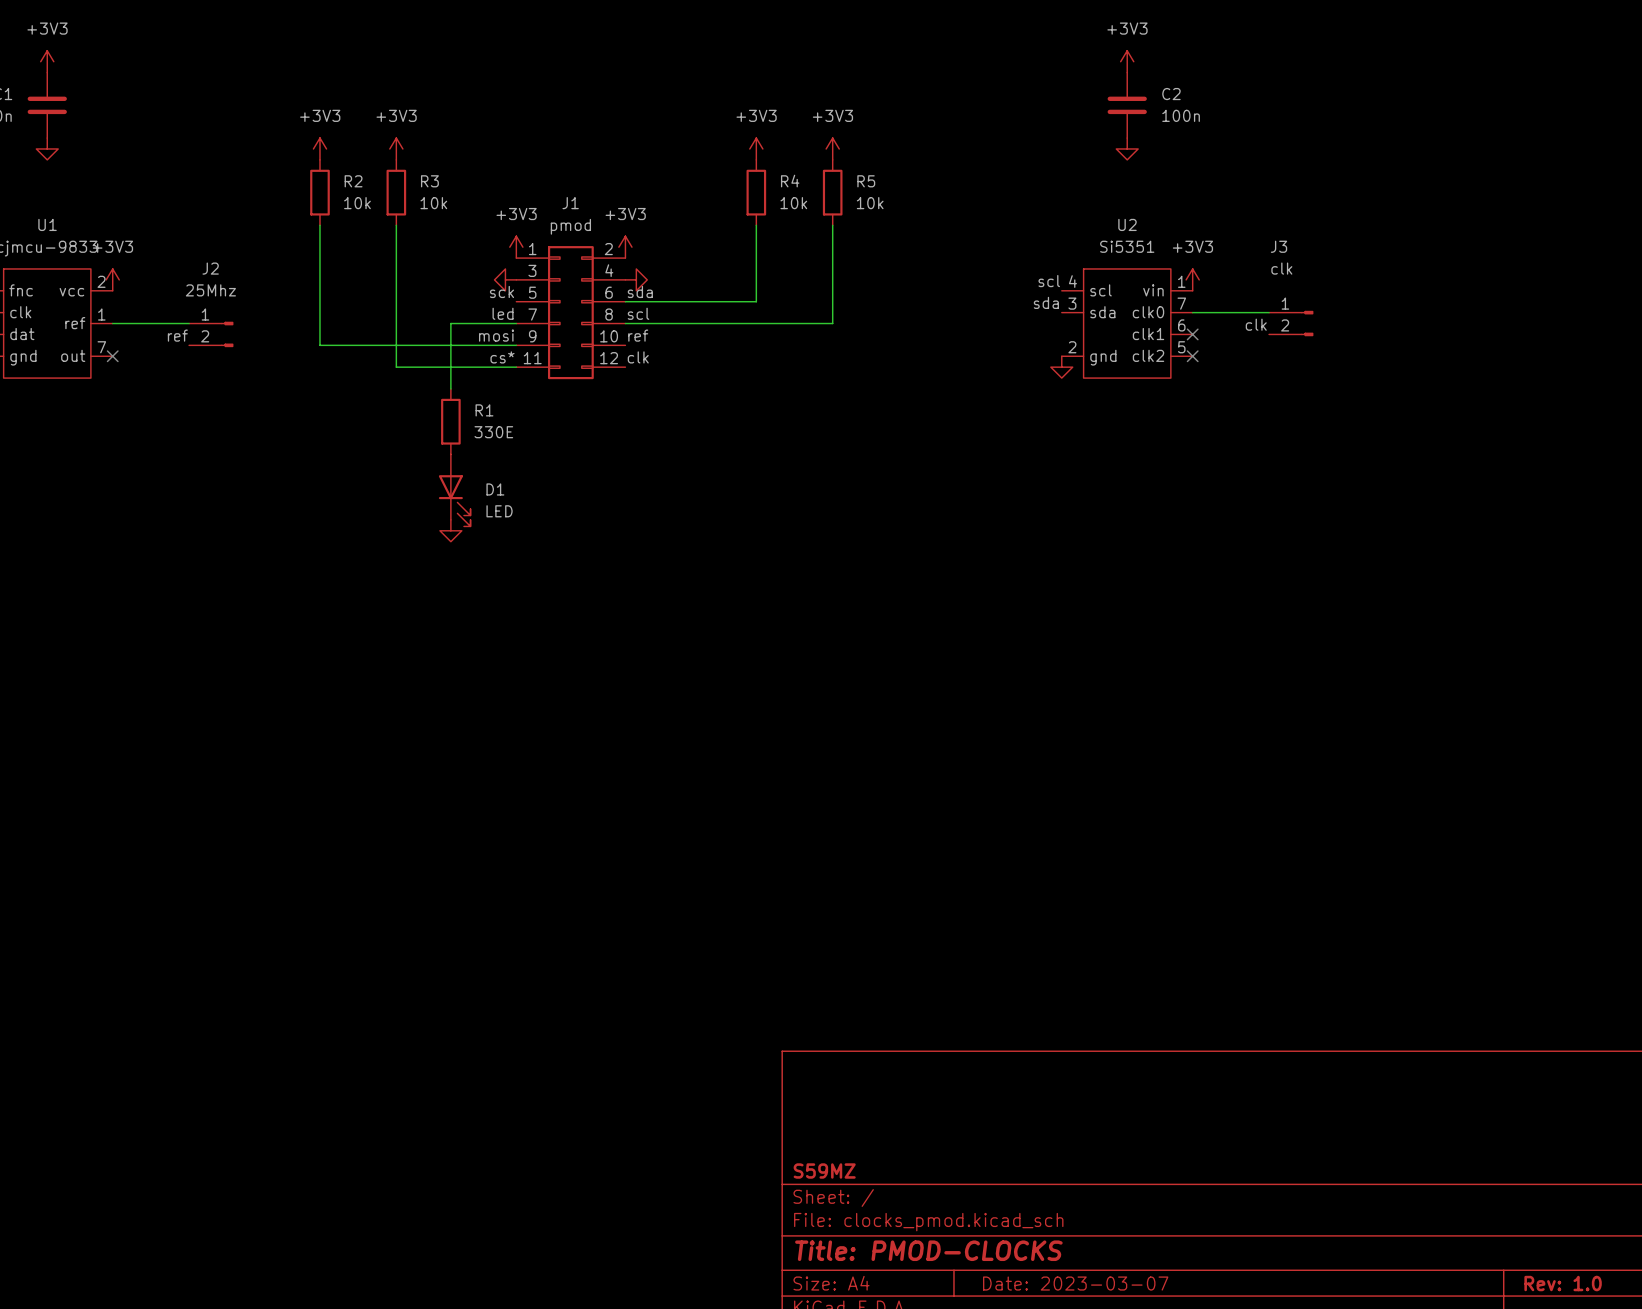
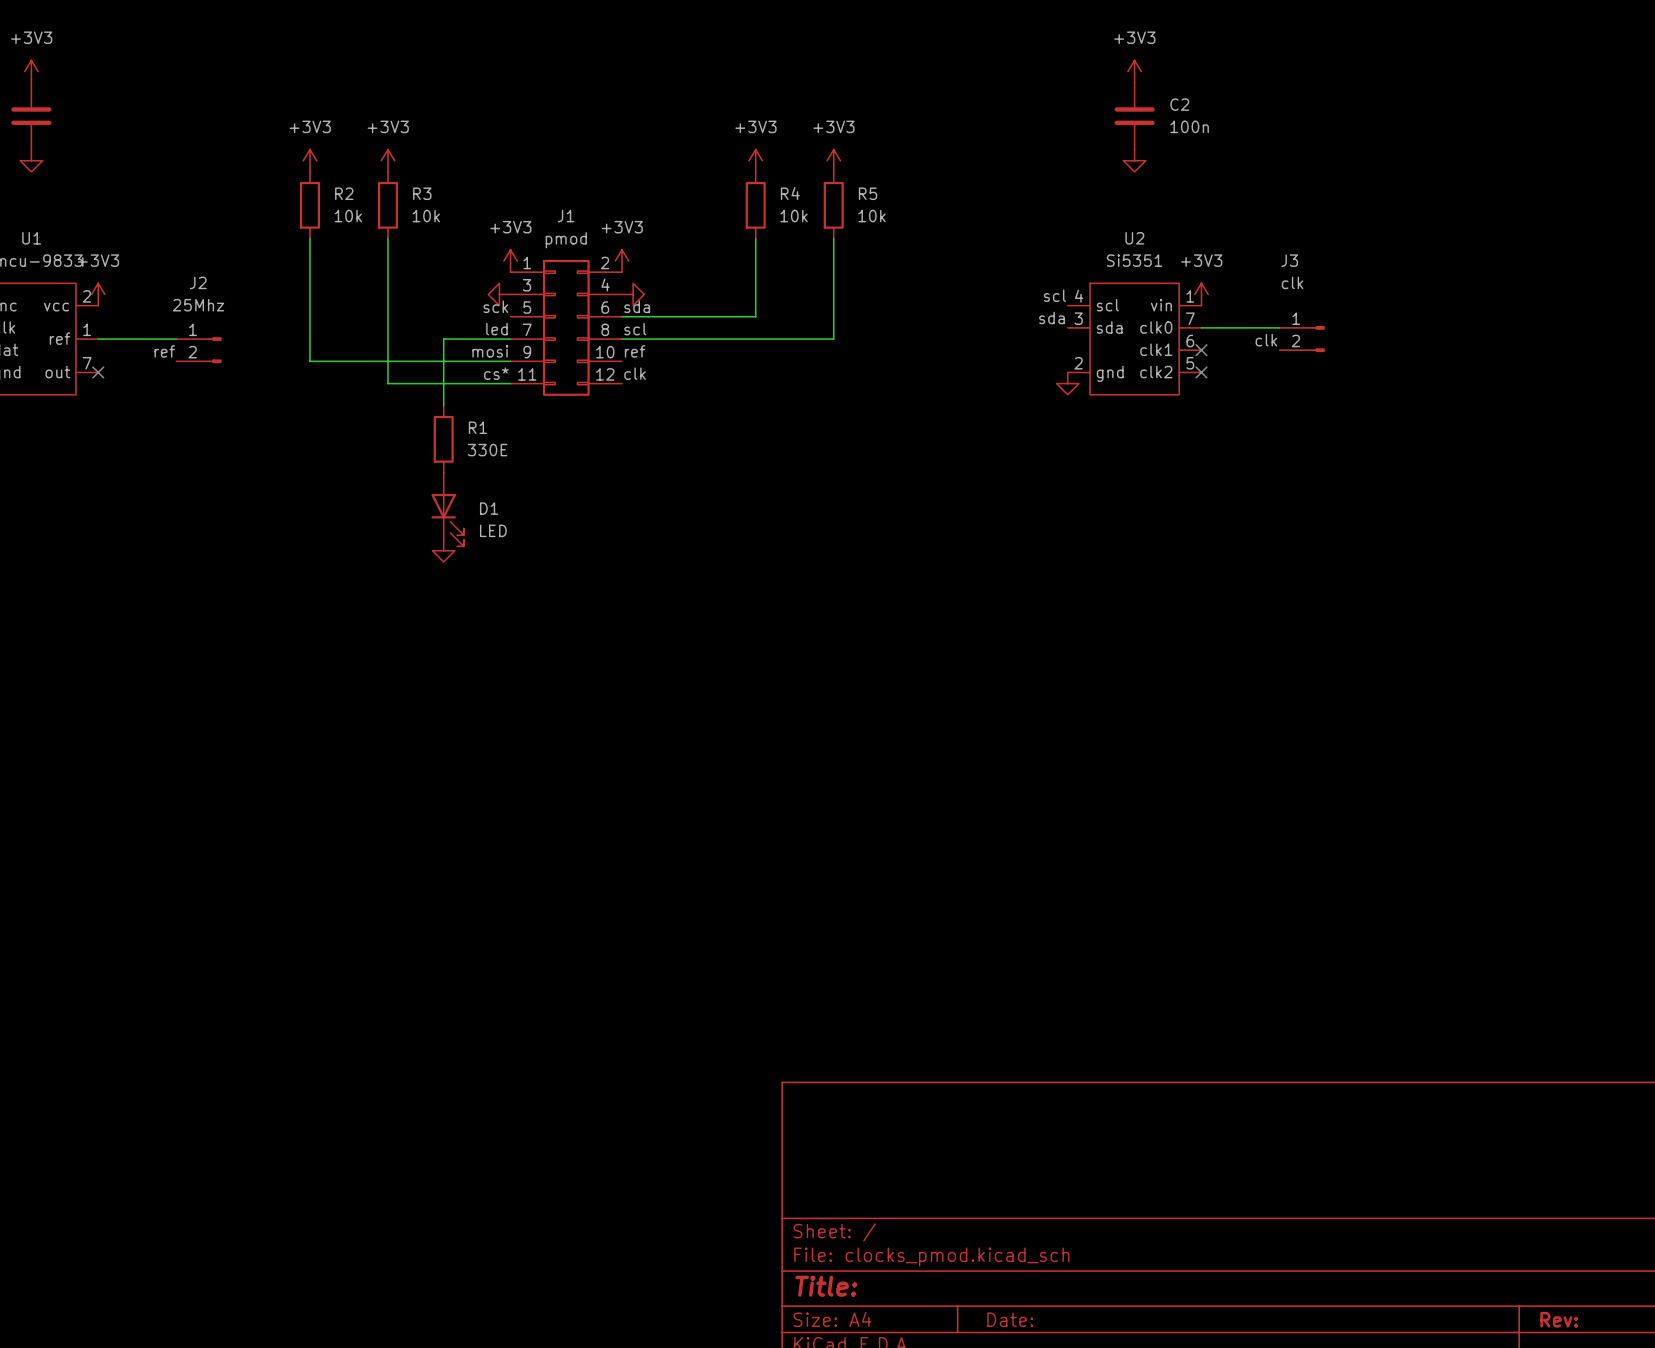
title block: S59MZ (824, 1171) -> none
title block: Title: PMOD-CLOCKS (928, 1250) -> Title: (826, 1286)
title block: Date: 2023-03-07 (1075, 1283) -> Date: (1010, 1319)
title block: Rev: 1.0 (1563, 1283) -> Rev: (1559, 1319)

